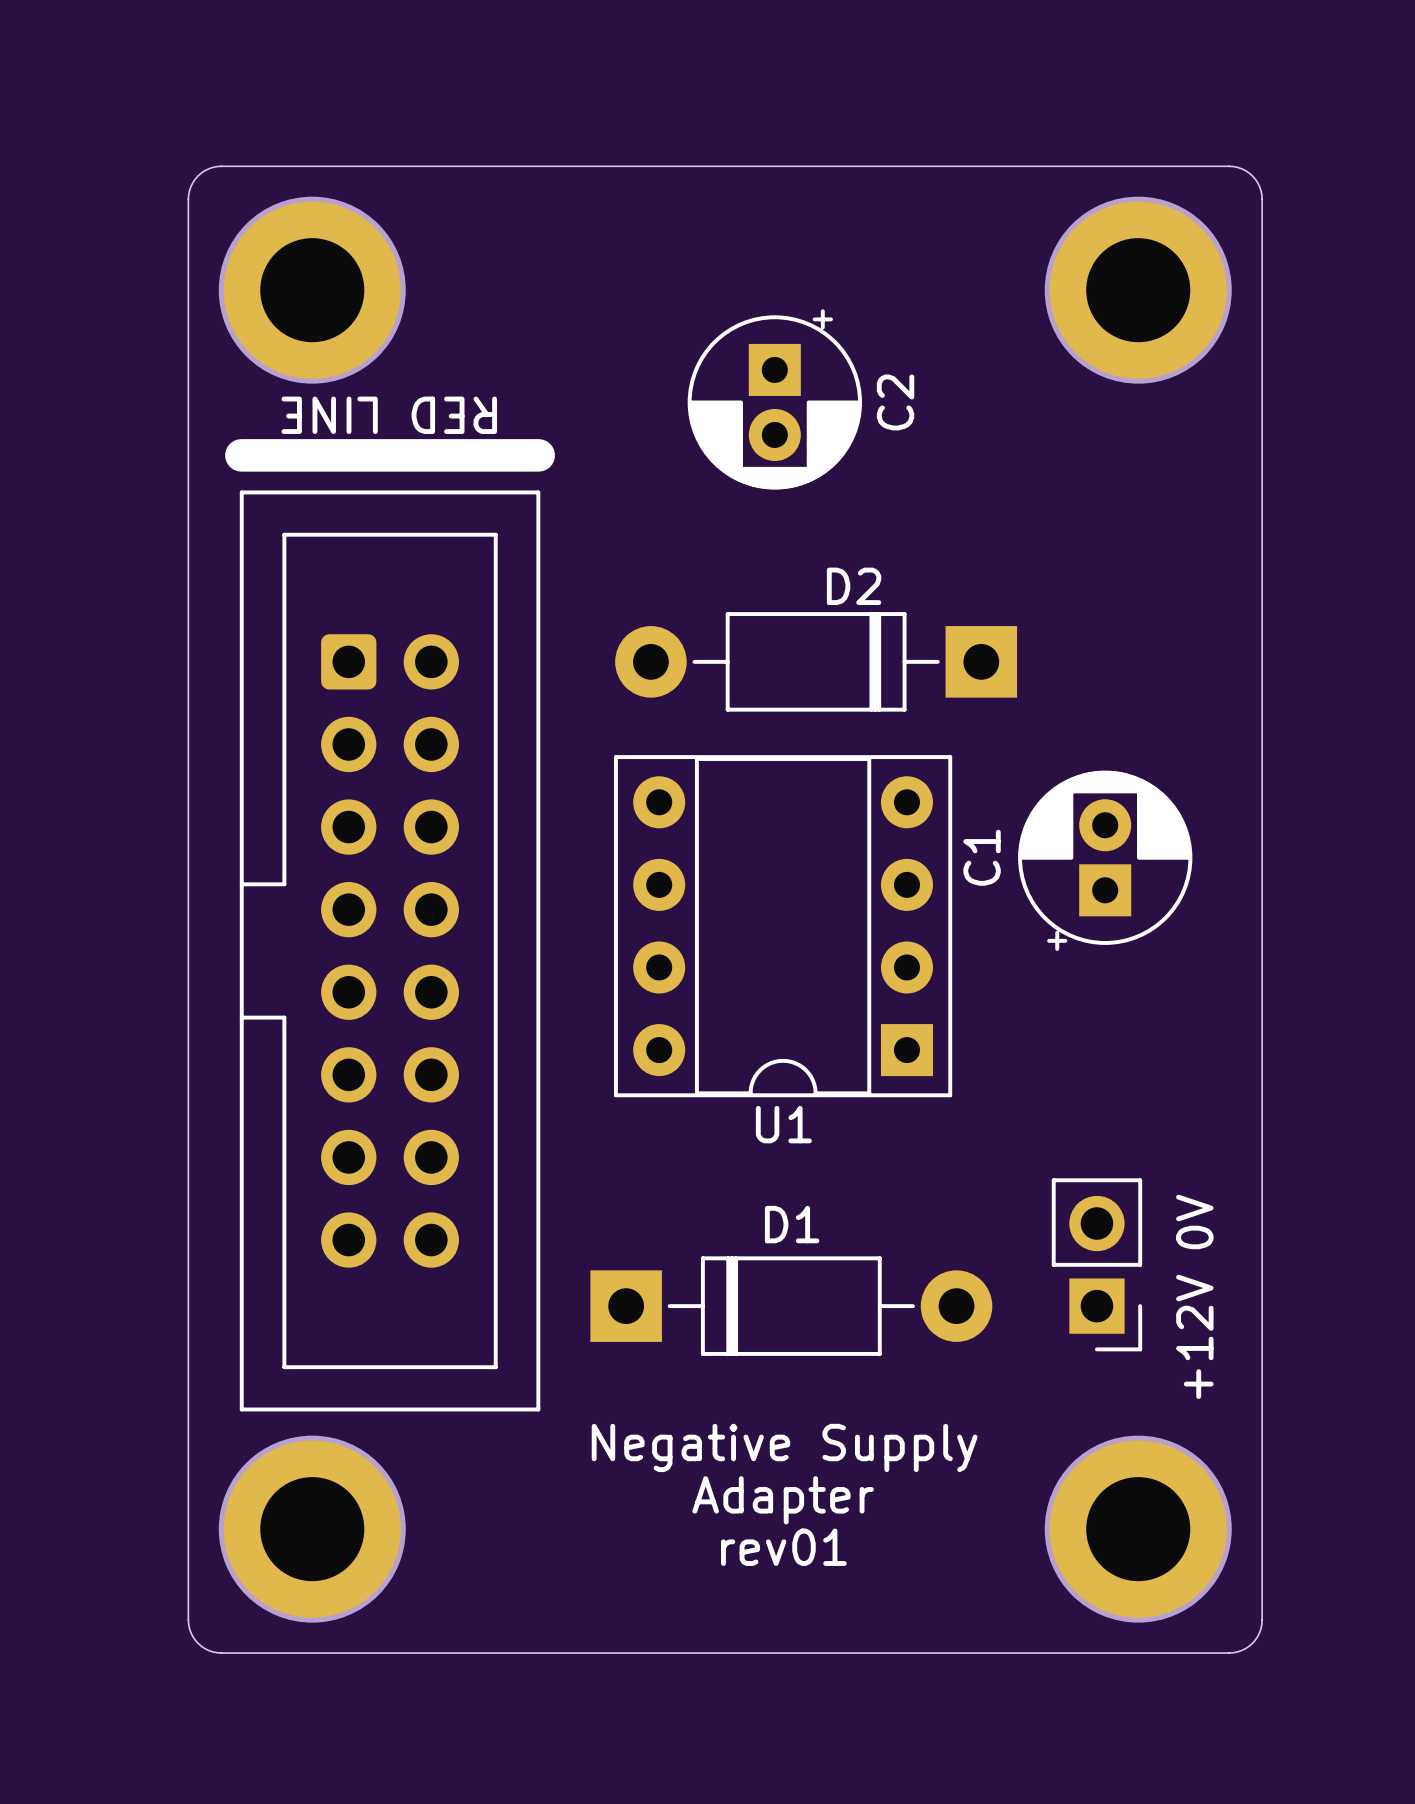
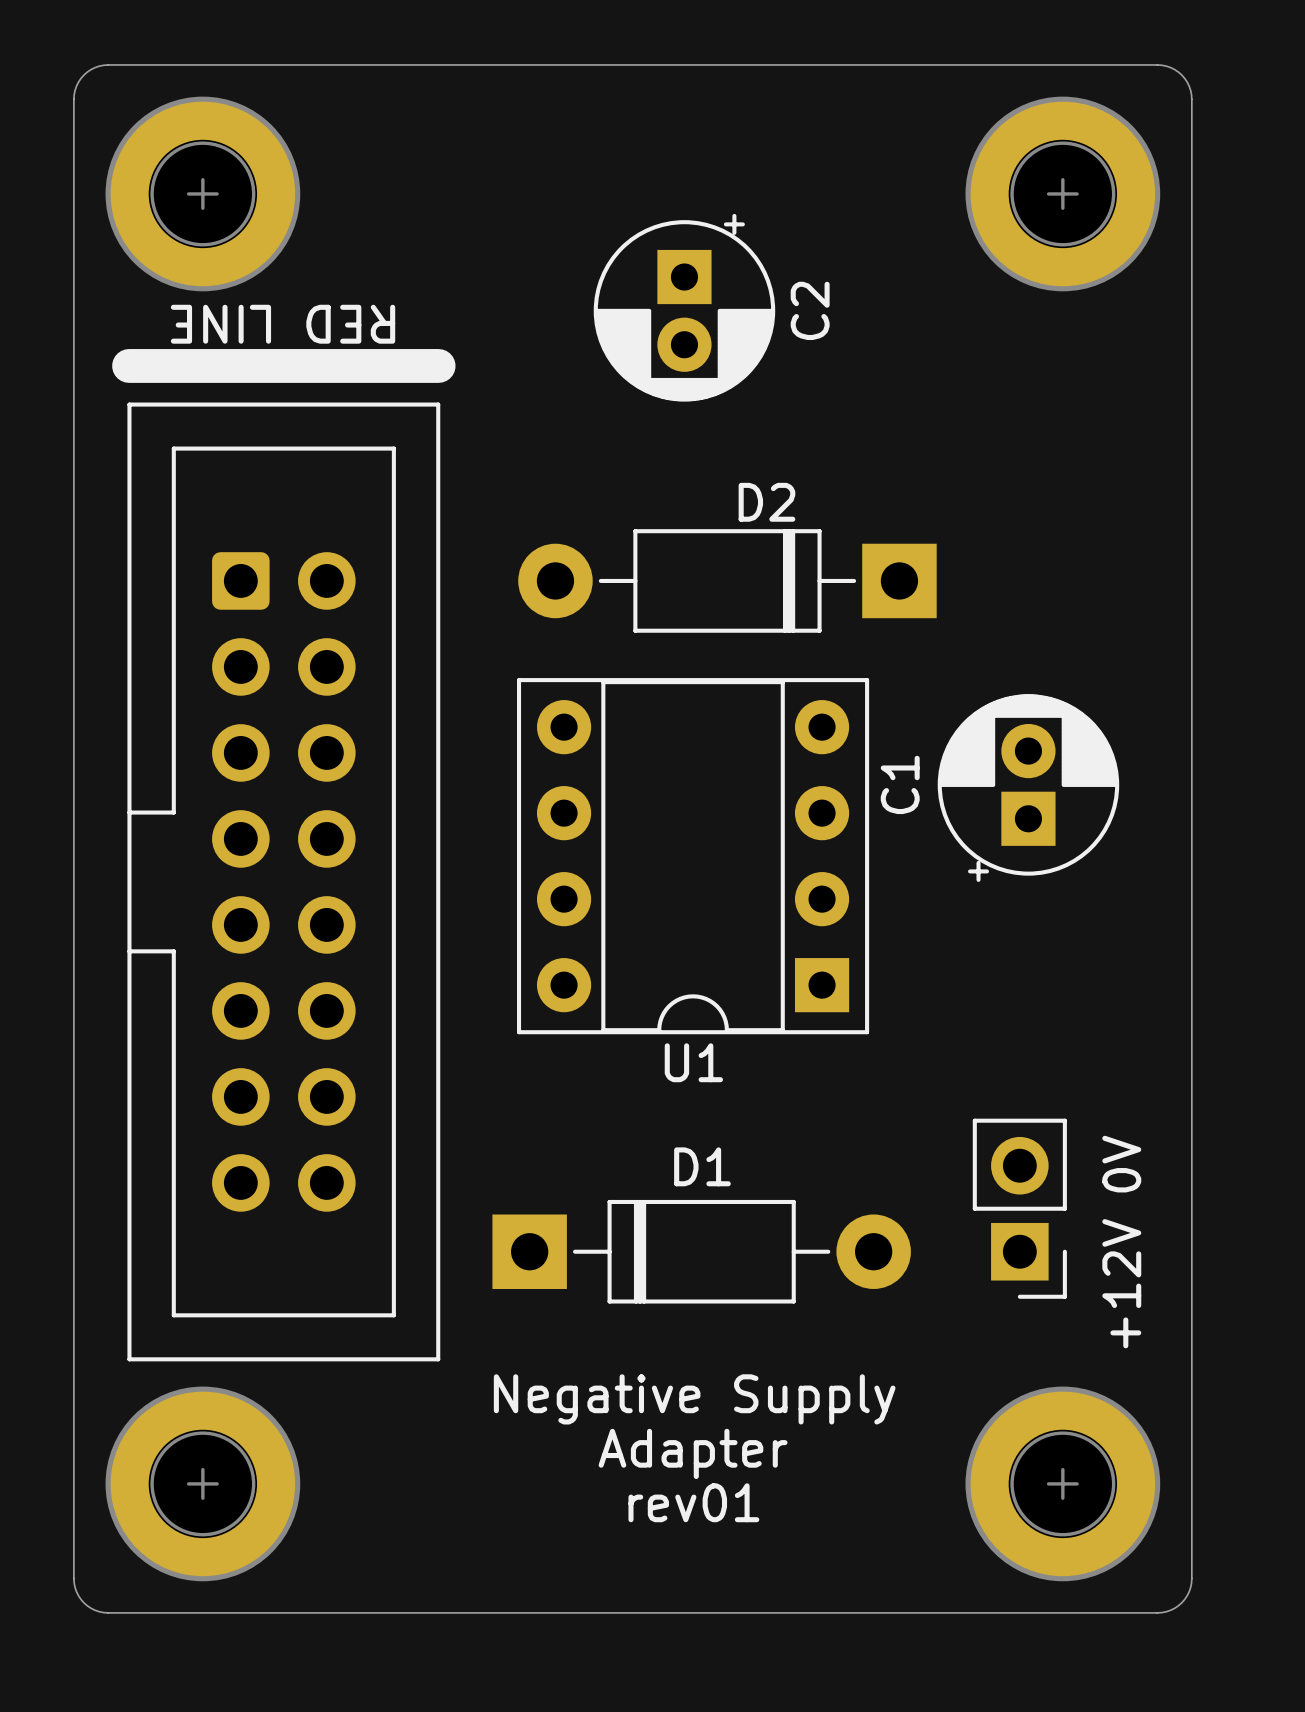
drawing: none -> [150, 141, 256, 247]
drawing: none -> [1010, 141, 1116, 247]
line: none -> (202, 179) (202, 208)
line: none -> (1062, 179) (1062, 208)
line: none -> (188, 193) (217, 193)
line: none -> (1048, 193) (1077, 193)
drawing: none -> [150, 1431, 256, 1537]
drawing: none -> [1010, 1431, 1116, 1537]
line: none -> (202, 1469) (202, 1498)
line: none -> (1062, 1469) (1062, 1498)
line: none -> (188, 1483) (217, 1483)
line: none -> (1048, 1483) (1077, 1483)

